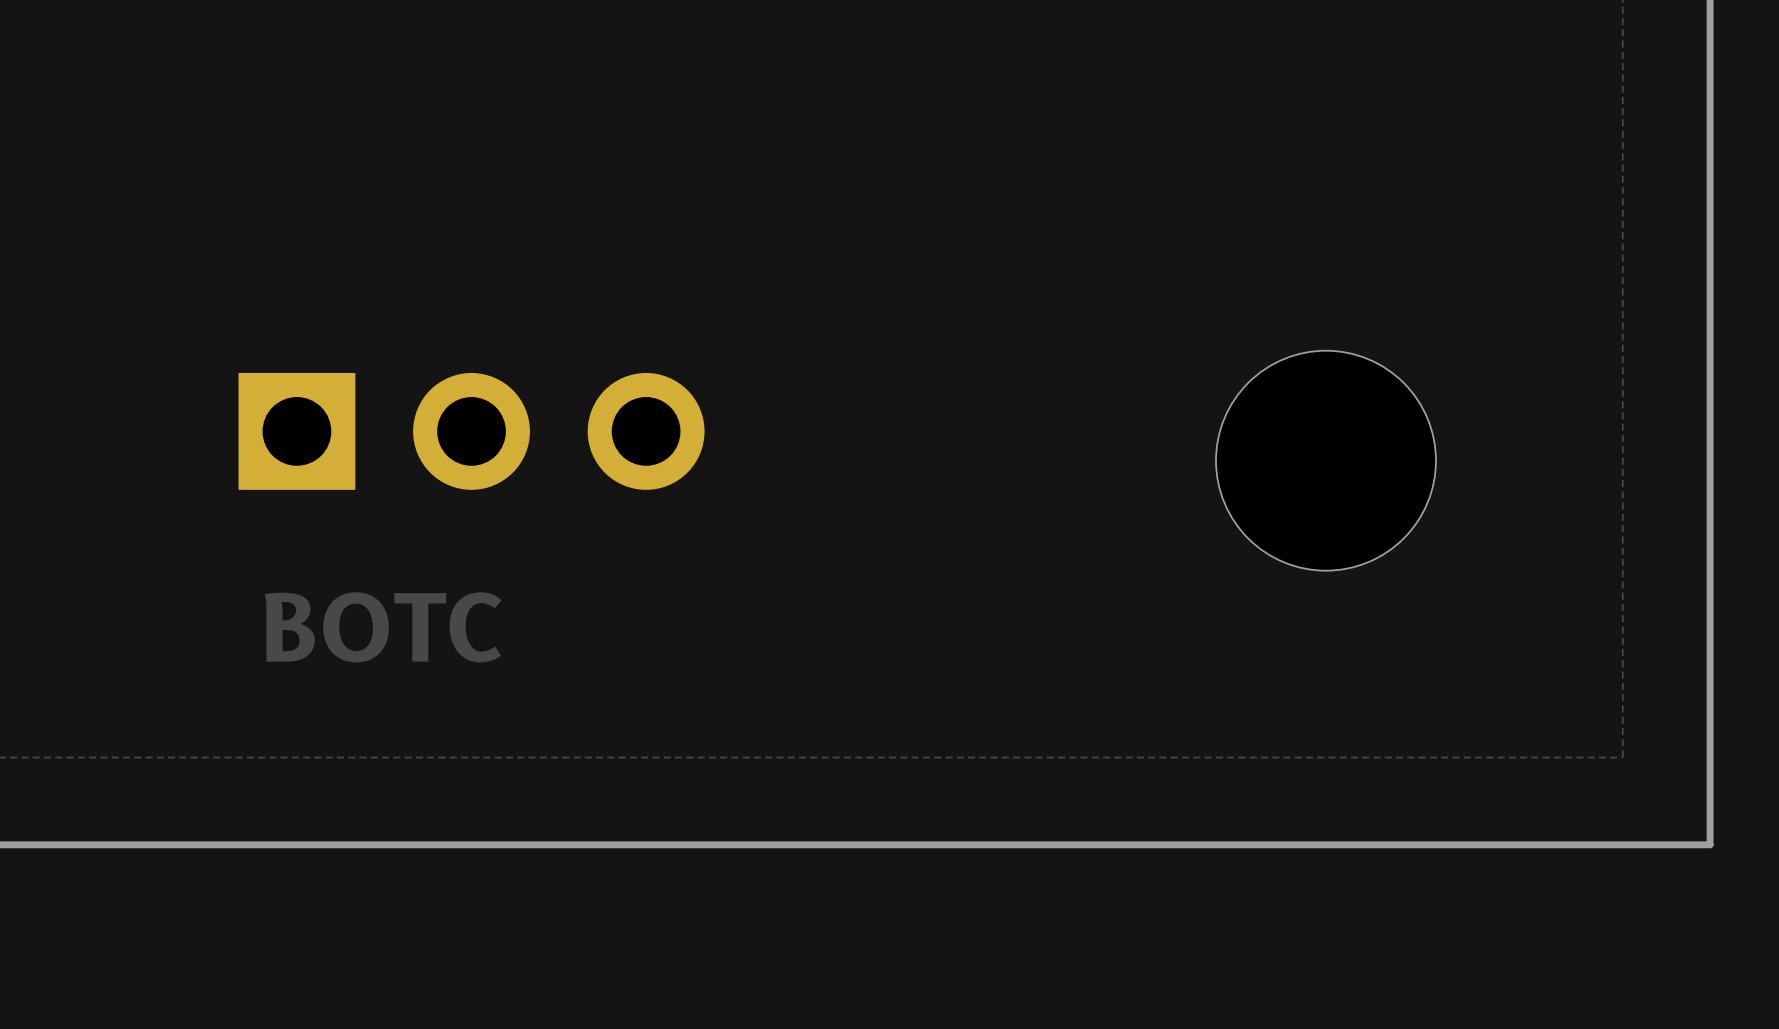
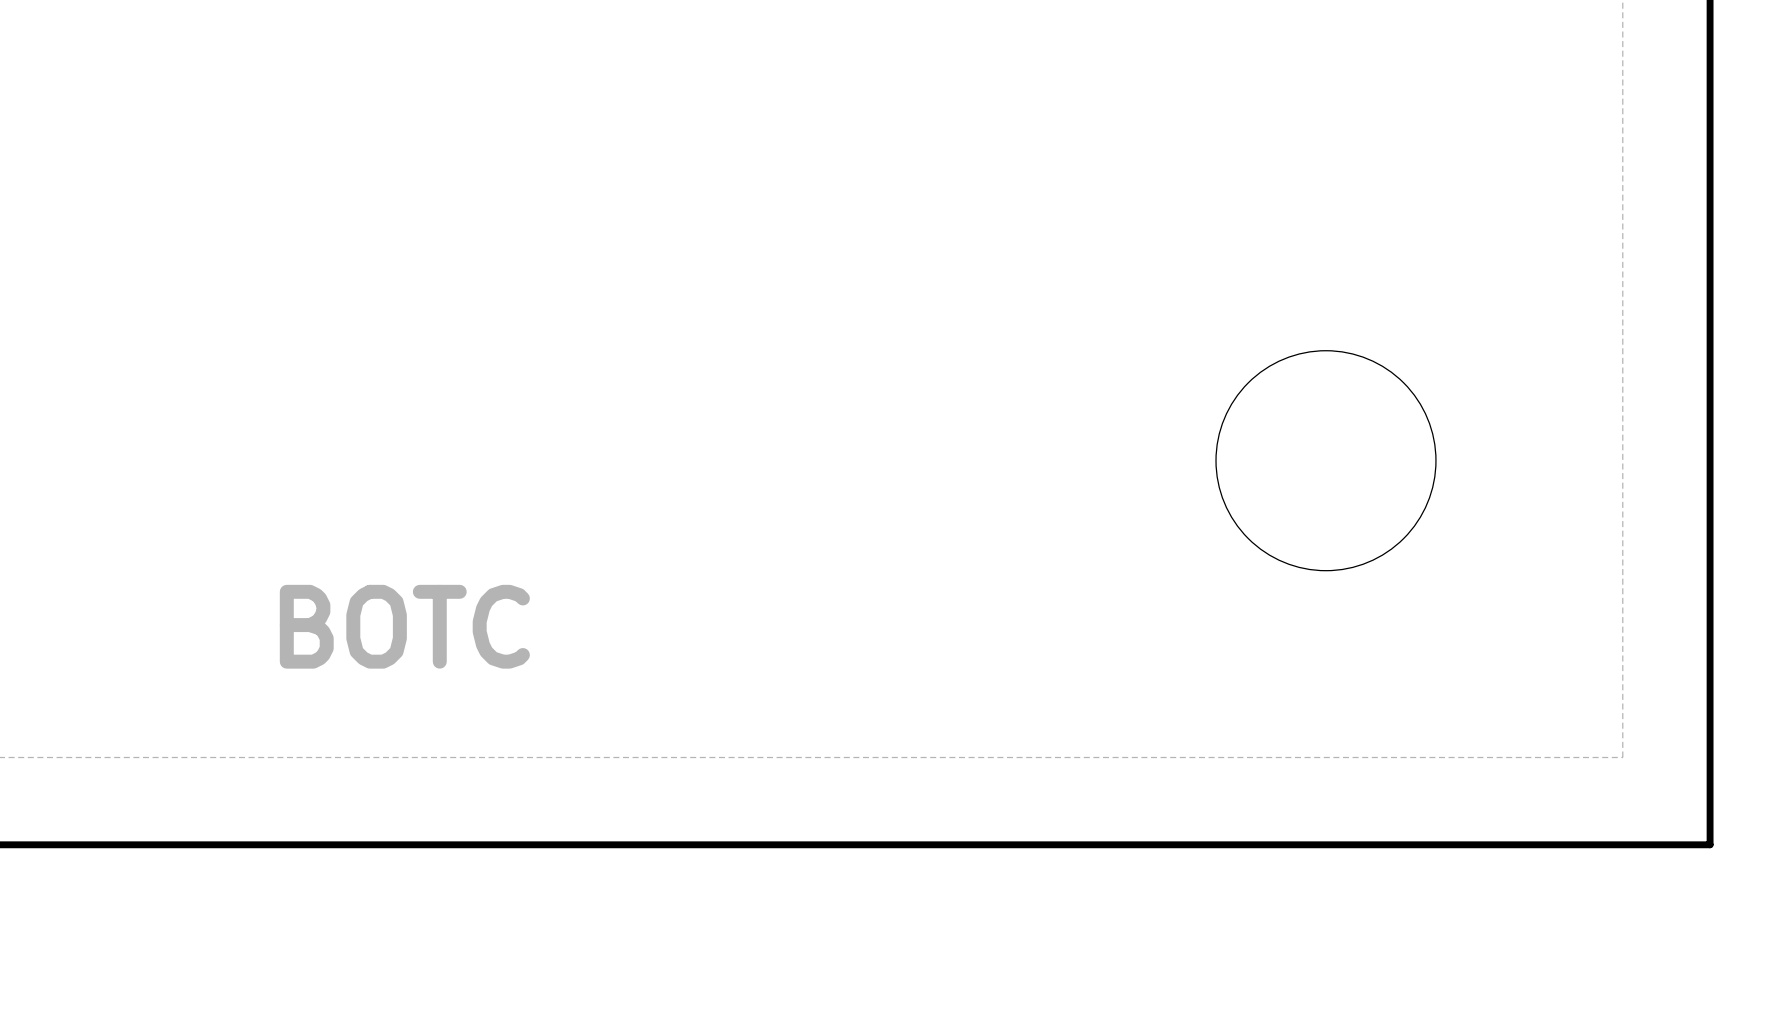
part: (471, 431) -> none

